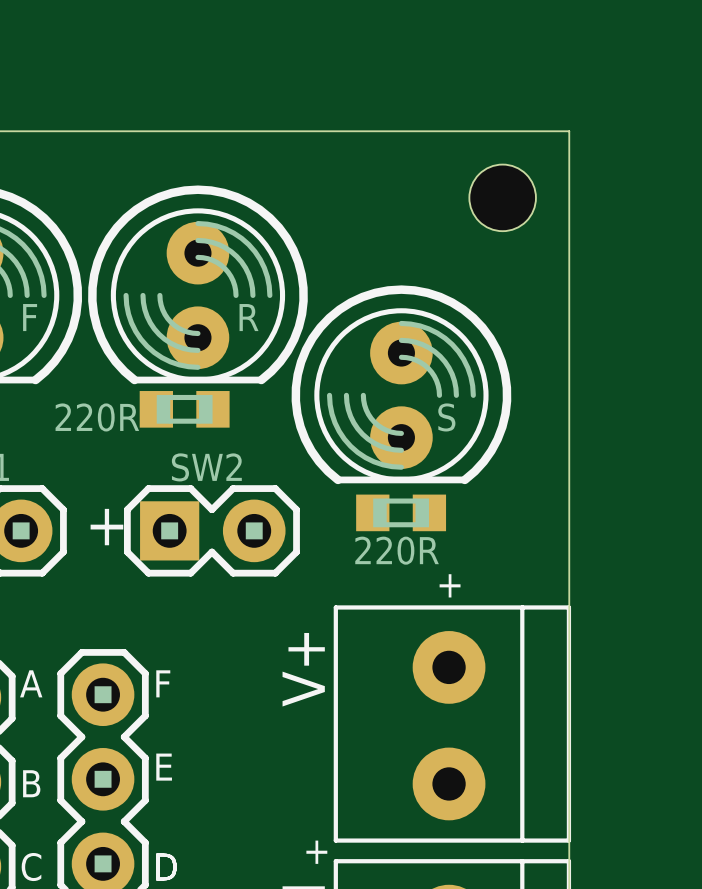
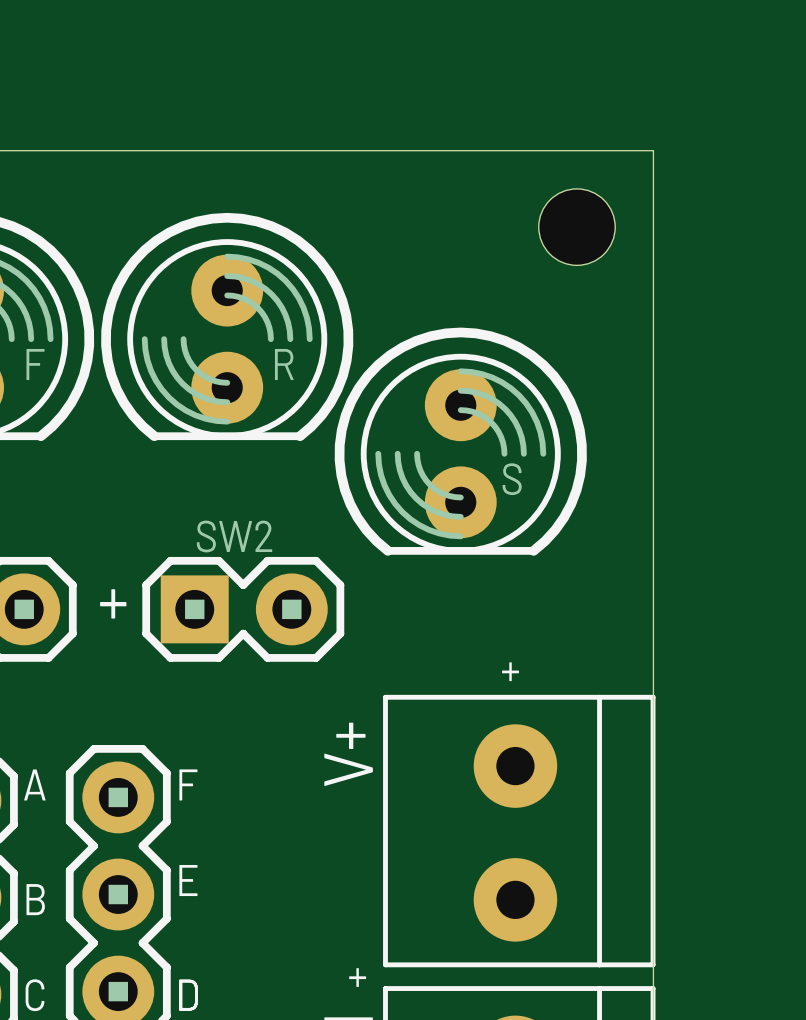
part: 220R (184, 409) -> none
part: 220R (401, 512) -> none

